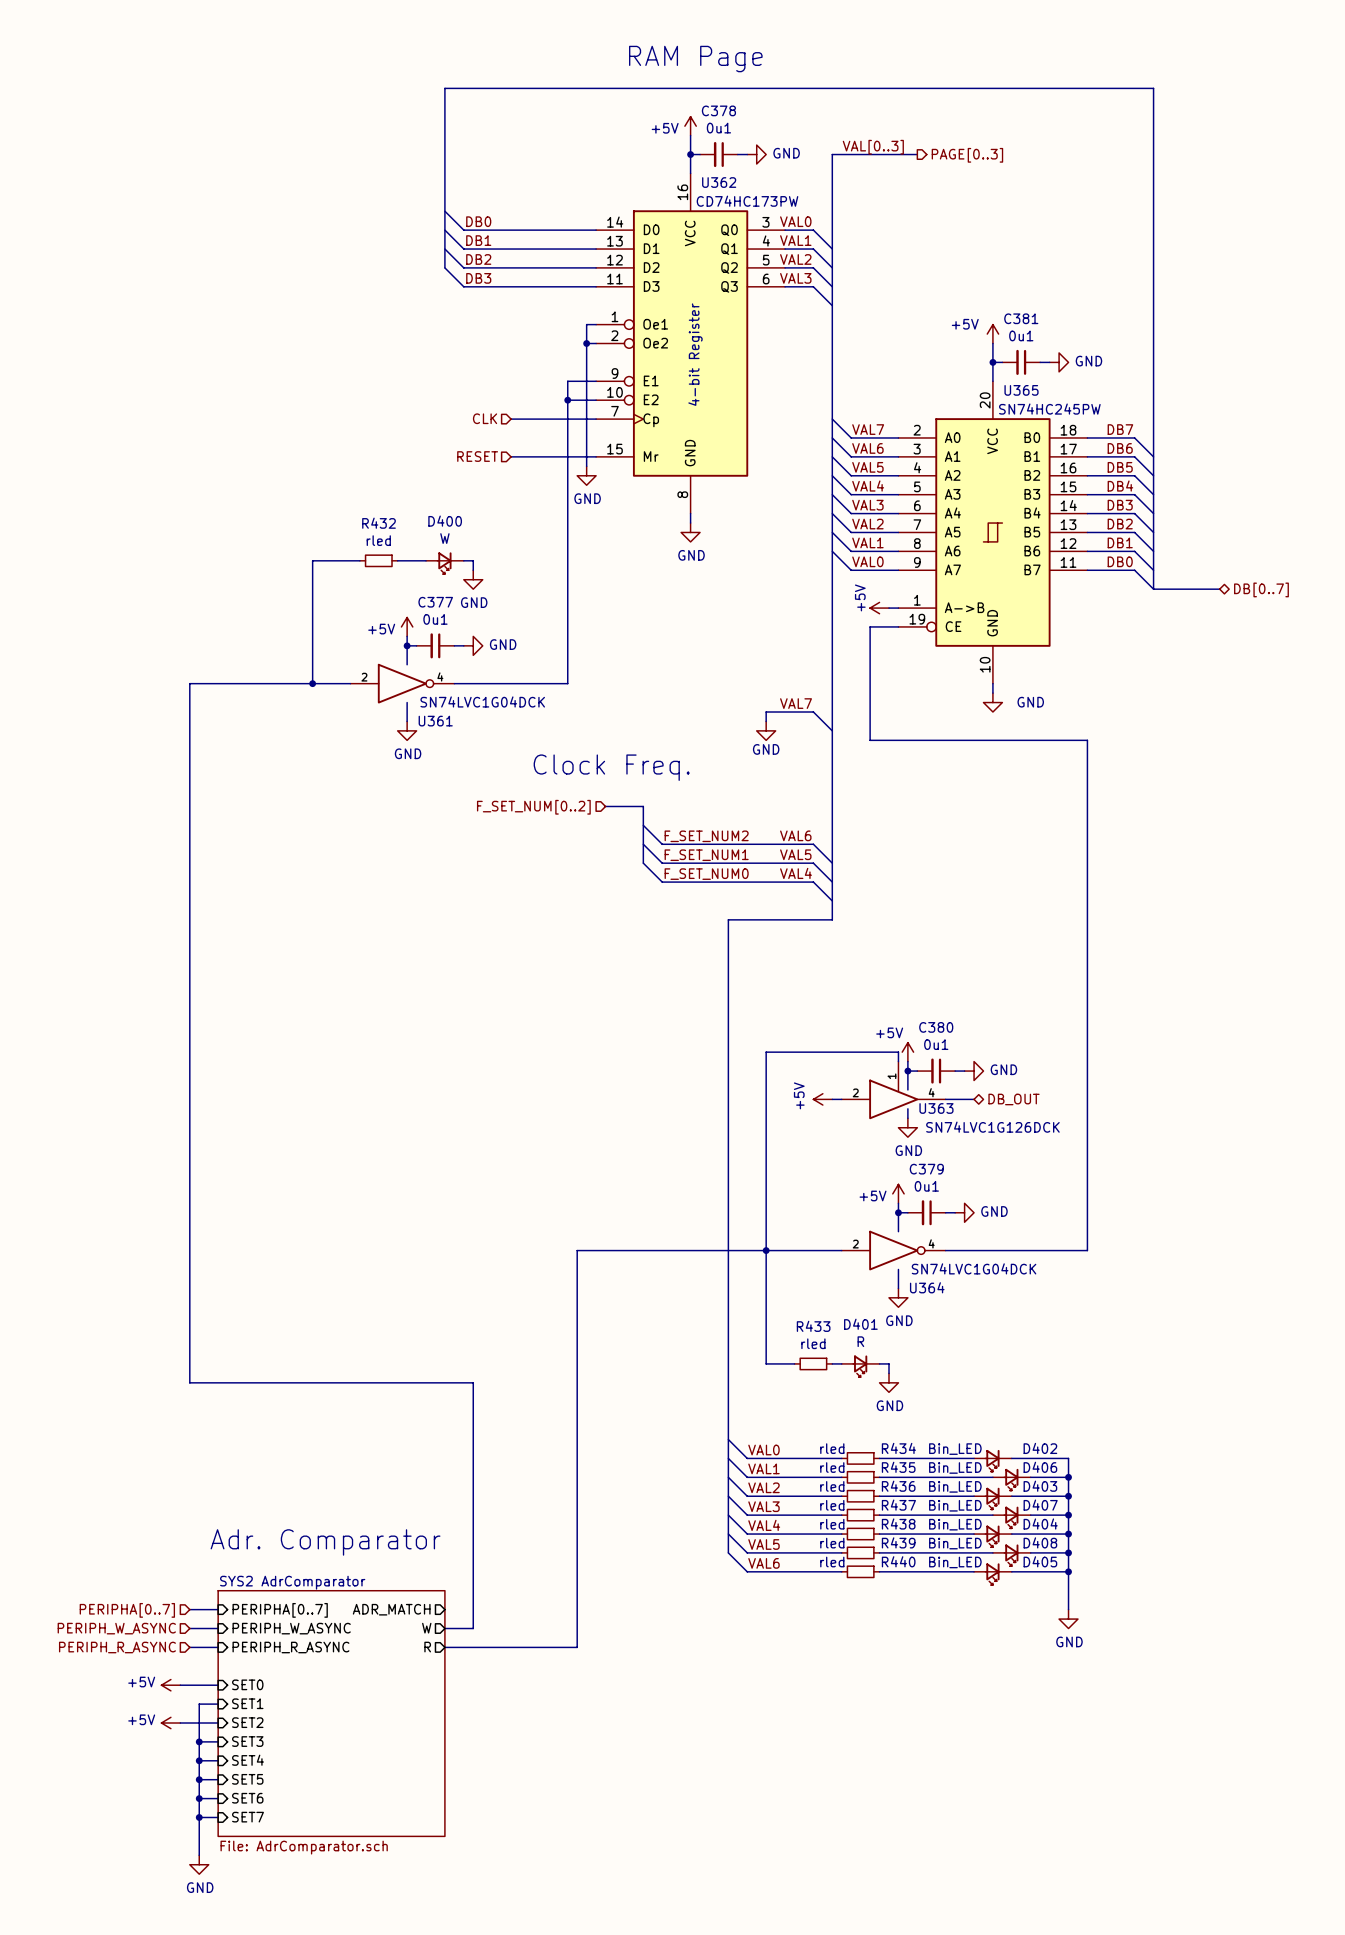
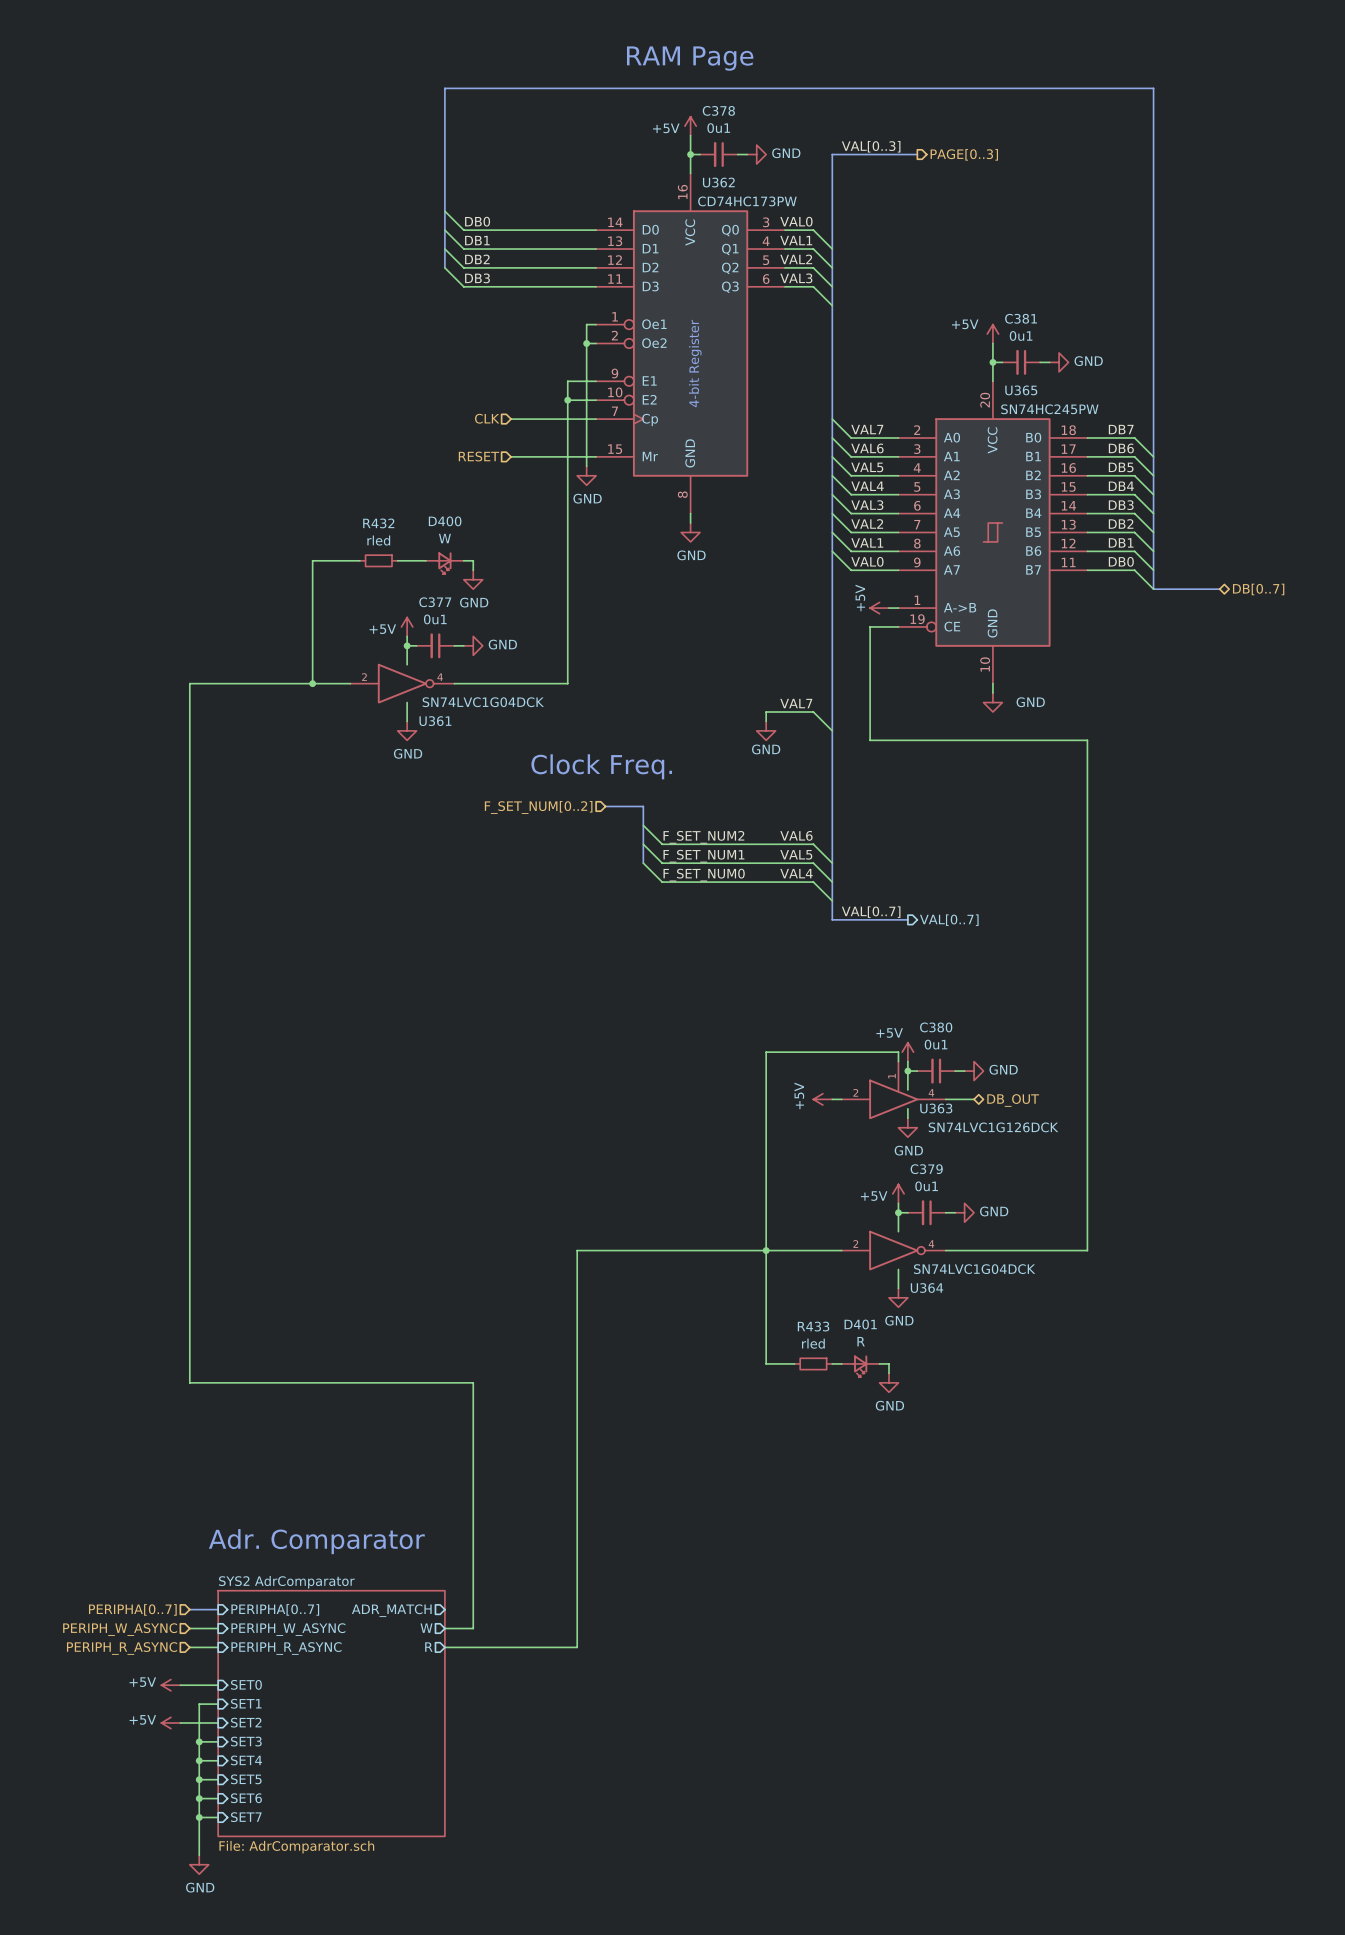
label: none -> VAL[0..7] (871, 912)
bus: (832, 919) (728, 919) (728, 1552) -> (832, 919) (907, 919)
sheet pin: none -> VAL[0..7] (949, 920)
wire: (728, 1439) (747, 1458) (841, 1458) -> none
label: VAL0 (763, 1450) -> none
wire: (728, 1458) (747, 1477) (841, 1477) -> none
R434: rled (860, 1458) -> none
wire: (879, 1458) (974, 1458) -> none
wire: (1011, 1458) (1068, 1458) (1068, 1609) -> none
D402: Bin_LED (992, 1460) -> none
label: VAL1 (763, 1468) -> none
wire: (728, 1477) (747, 1496) (841, 1496) -> none
R435: rled (860, 1477) -> none
wire: (879, 1477) (992, 1477) -> none
wire: (1030, 1477) (1068, 1477) -> none
junction: (1068, 1477) -> none
D406: Bin_LED (1011, 1479) -> none
label: VAL2 (763, 1487) -> none
wire: (728, 1496) (747, 1515) (841, 1515) -> none
R436: rled (860, 1496) -> none
wire: (879, 1496) (974, 1496) -> none
wire: (1011, 1496) (1068, 1496) -> none
junction: (1068, 1496) -> none
D403: Bin_LED (992, 1498) -> none
label: VAL3 (763, 1506) -> none
wire: (728, 1515) (747, 1534) (841, 1534) -> none
R437: rled (860, 1515) -> none
wire: (879, 1515) (992, 1515) -> none
wire: (1030, 1515) (1068, 1515) -> none
junction: (1068, 1515) -> none
D407: Bin_LED (1011, 1517) -> none
label: VAL4 (764, 1525) -> none
wire: (728, 1534) (747, 1552) (841, 1552) -> none
R438: rled (860, 1534) -> none
wire: (879, 1534) (974, 1534) -> none
wire: (1011, 1534) (1068, 1534) -> none
junction: (1068, 1534) -> none
D404: Bin_LED (992, 1536) -> none
label: VAL5 (763, 1544) -> none
wire: (728, 1552) (747, 1571) (841, 1571) -> none
R439: rled (860, 1552) -> none
wire: (879, 1552) (992, 1552) -> none
wire: (1030, 1552) (1068, 1552) -> none
junction: (1068, 1552) -> none
D408: Bin_LED (1011, 1555) -> none
label: VAL6 (763, 1563) -> none
R440: rled (860, 1571) -> none
wire: (879, 1571) (974, 1571) -> none
wire: (1011, 1571) (1068, 1571) -> none
junction: (1068, 1571) -> none
D405: Bin_LED (992, 1574) -> none
power symbol: GND (1068, 1619) -> none

